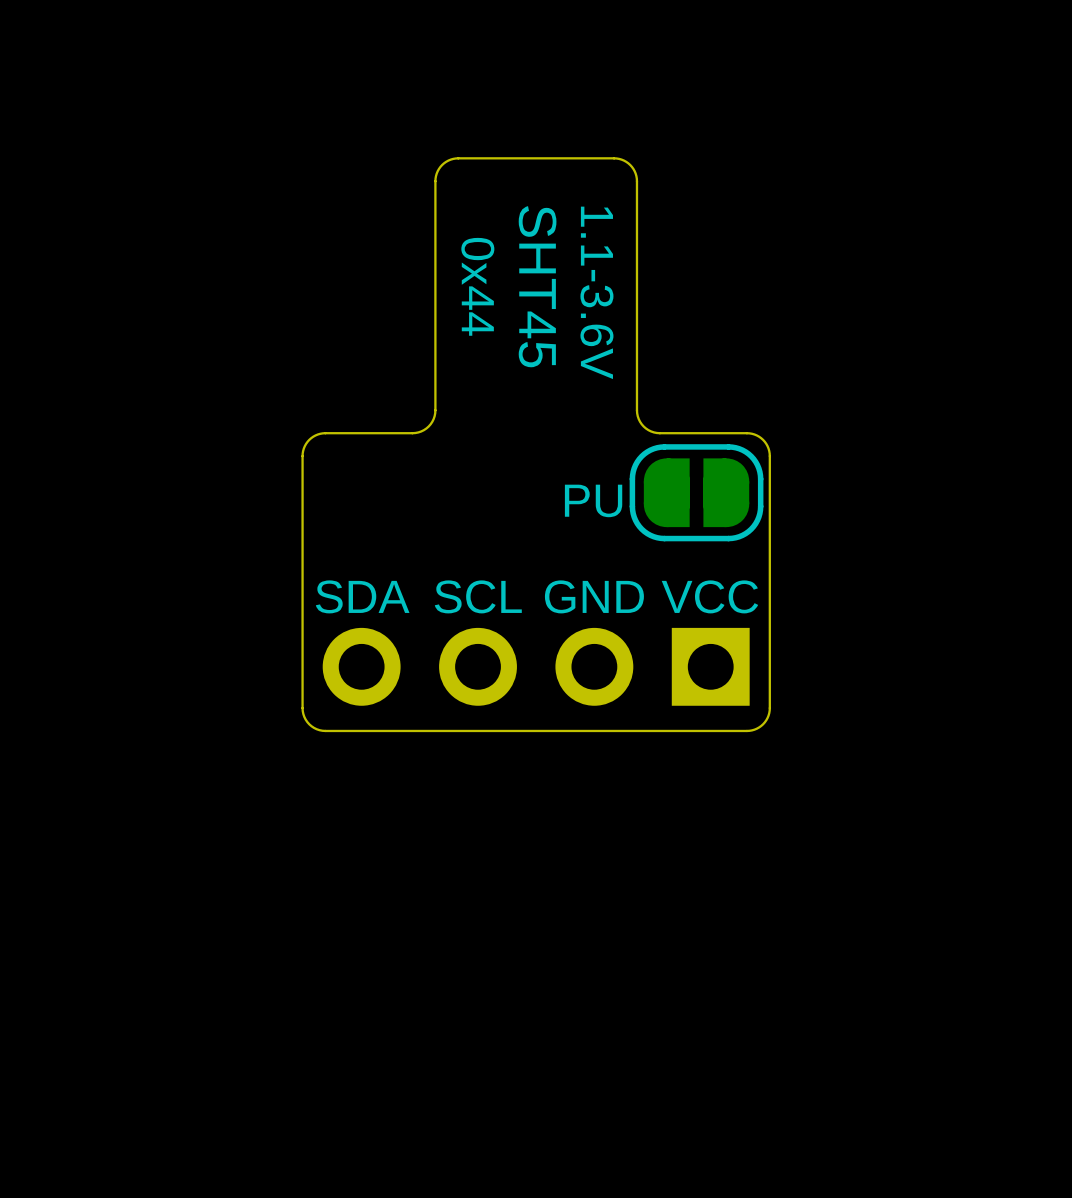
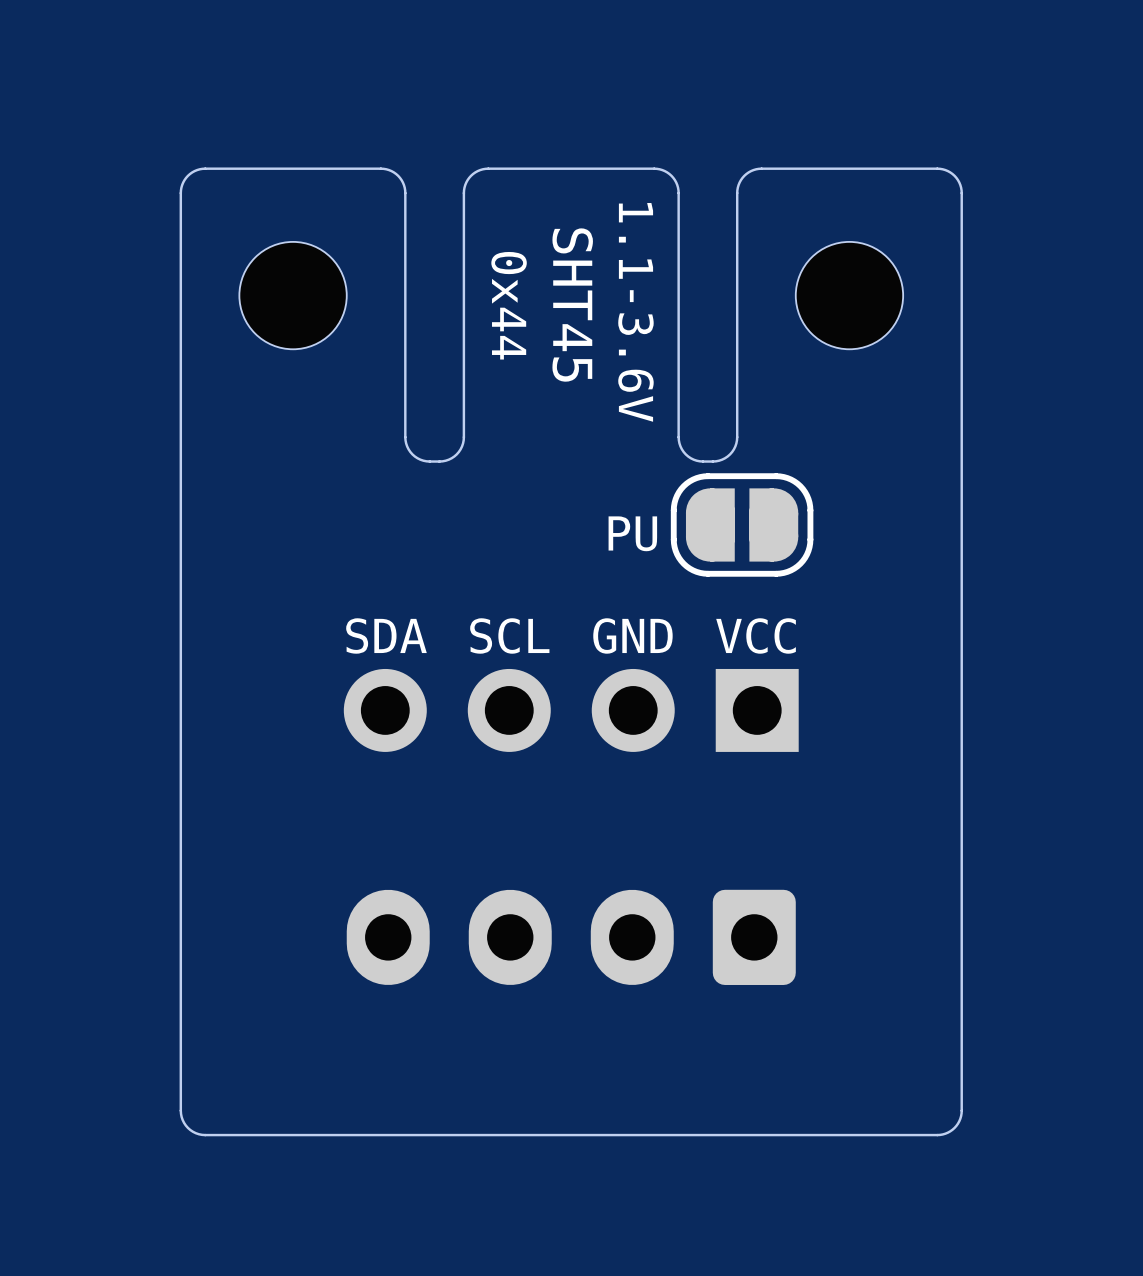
part: none -> (293, 295)
part: none -> (849, 295)
board edge: (669, 433) (749, 433) (761, 438) (768, 448) (769, 708) (767, 718) (761, 725) (746, 730) (319, 730) (307, 722) (302, 708) (303, 451) (309, 439) (320, 433) (403, 433) -> (712, 461) (722, 459) (730, 454) (737, 440) (737, 193) (742, 177) (751, 171) (761, 168) (937, 168) (952, 174) (959, 182) (961, 193) (961, 1110) (957, 1123) (945, 1133) (205, 1135) (193, 1131) (185, 1125) (180, 1110) (180, 193) (183, 182) (190, 174) (205, 168) (380, 168) (391, 171) (399, 177) (405, 193) (405, 440) (412, 454) (420, 459) (429, 461)
part: none -> (571, 937)

